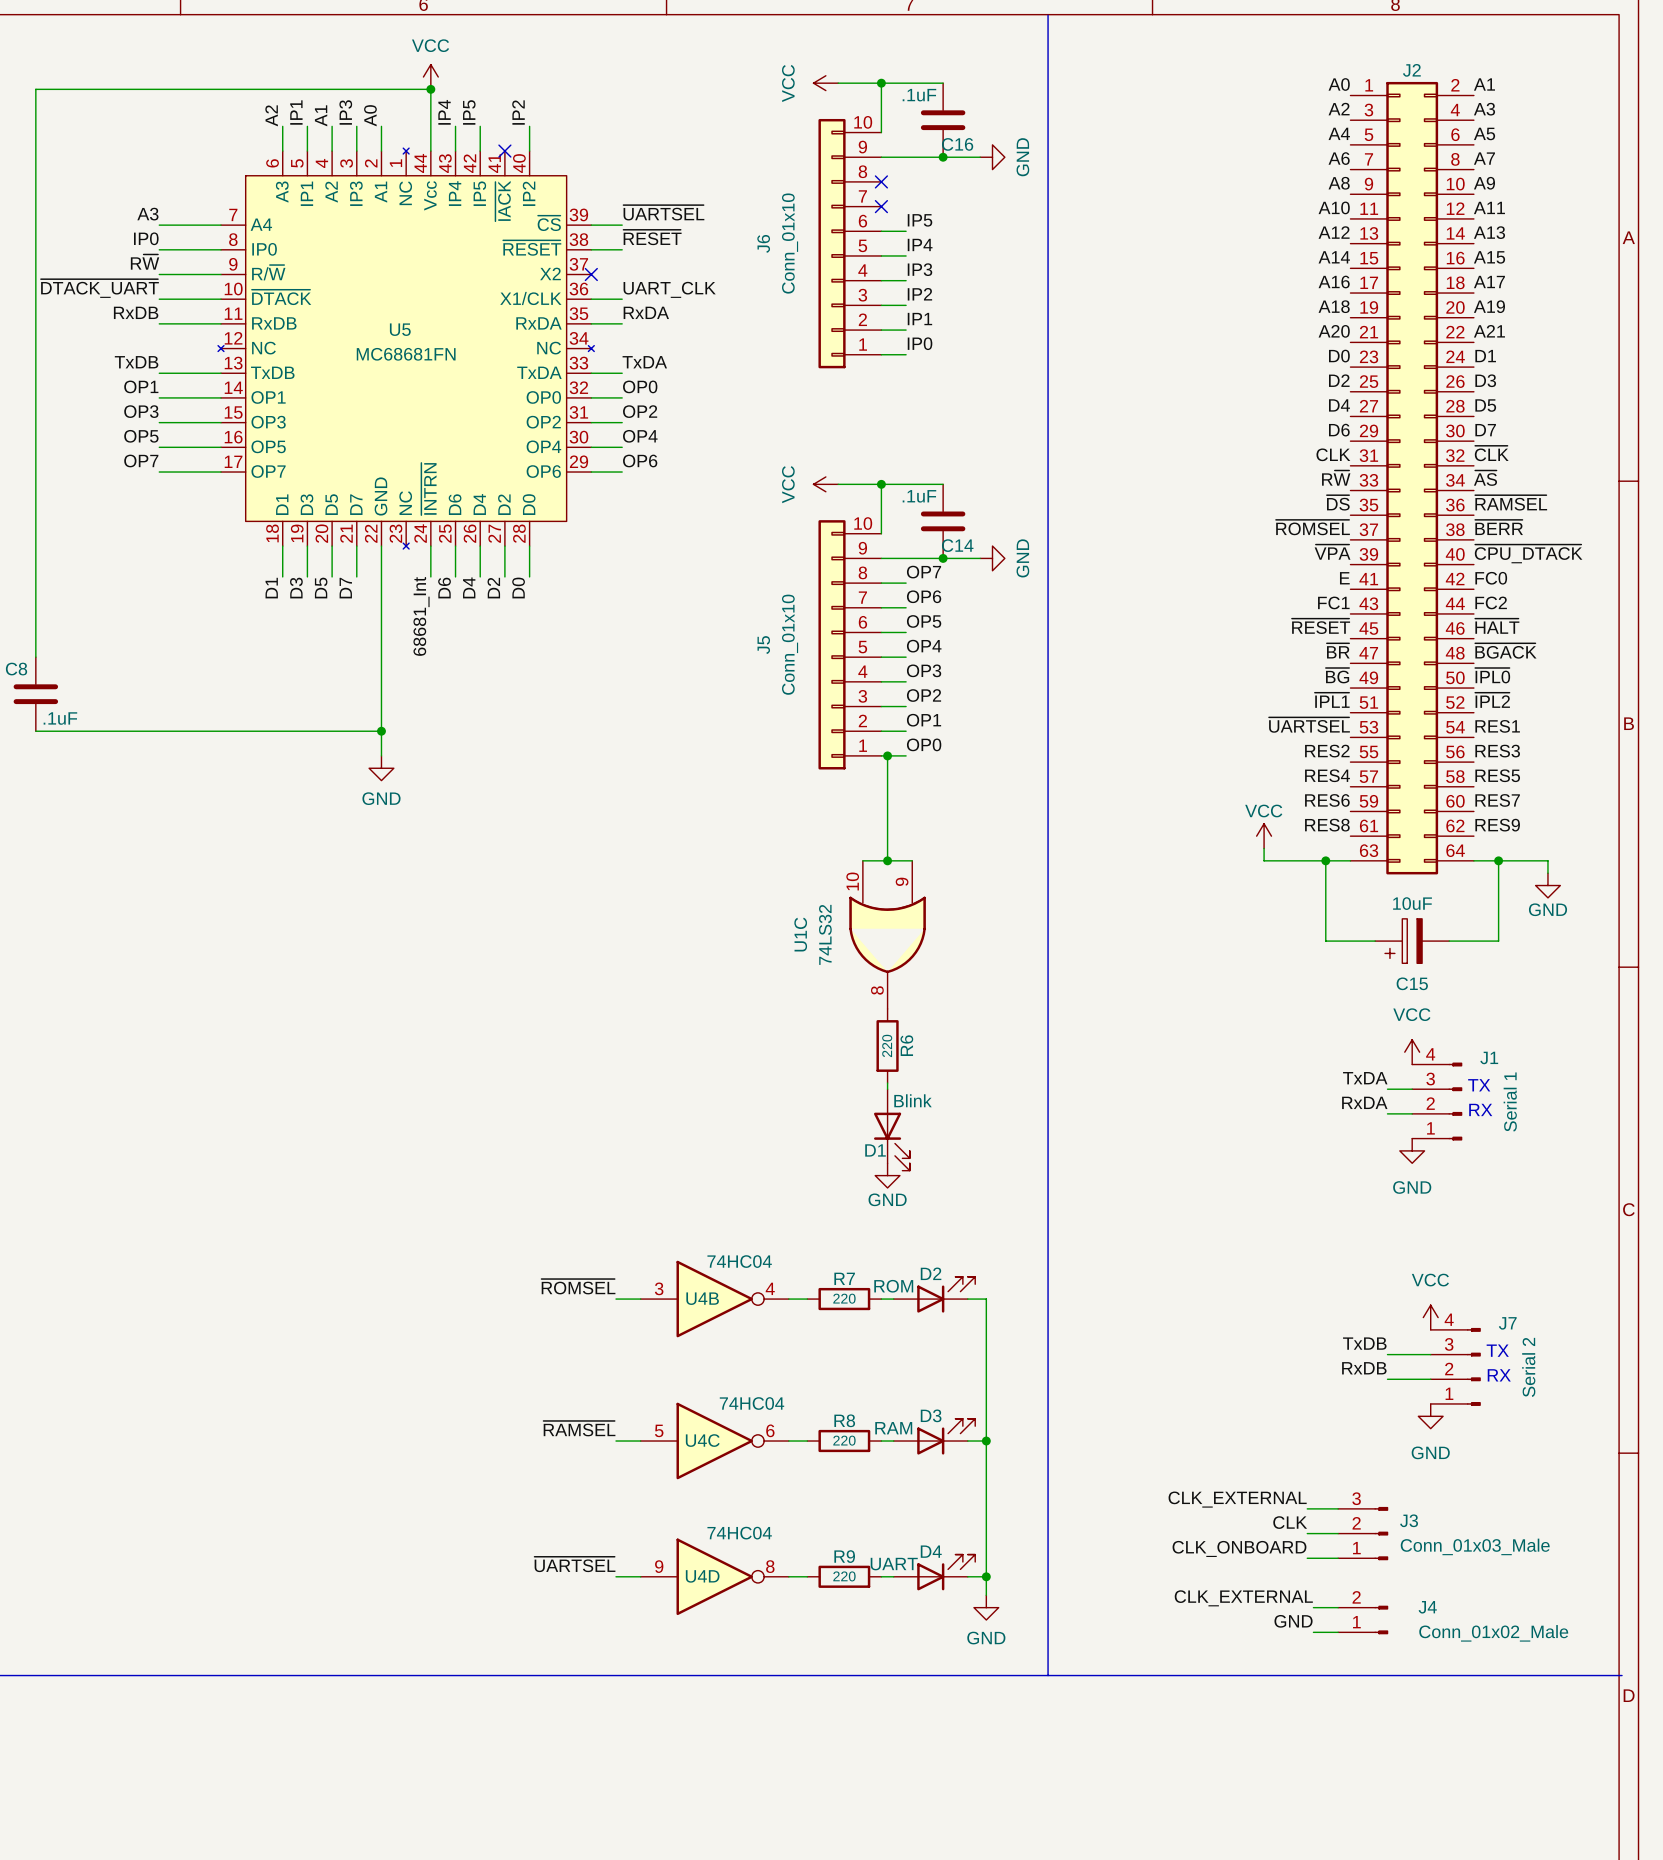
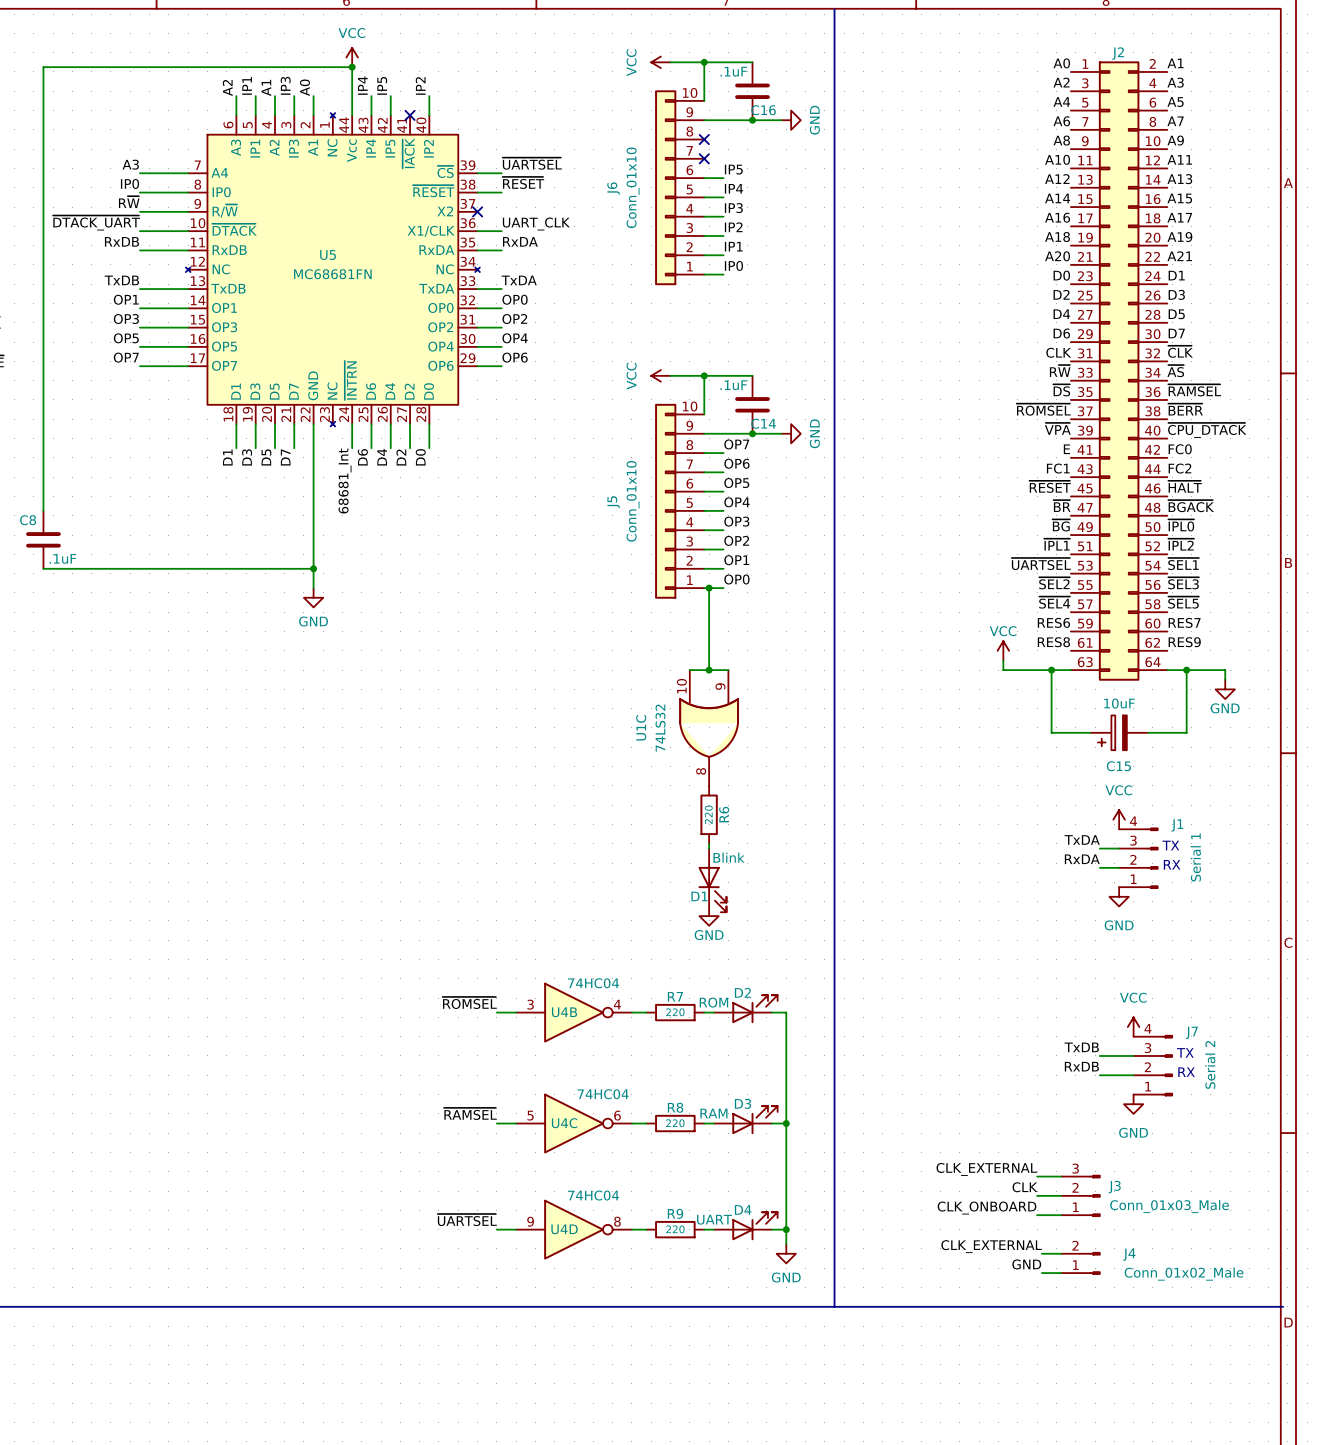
label: RES1 (1497, 726) -> ~{SEL1} (1183, 564)
label: RES2 (1327, 751) -> ~{SEL2} (1054, 583)
label: RES3 (1497, 751) -> ~{SEL3} (1183, 583)
label: RES4 (1327, 775) -> ~{SEL4} (1054, 602)
label: RES5 (1497, 775) -> ~{SEL5} (1183, 602)

